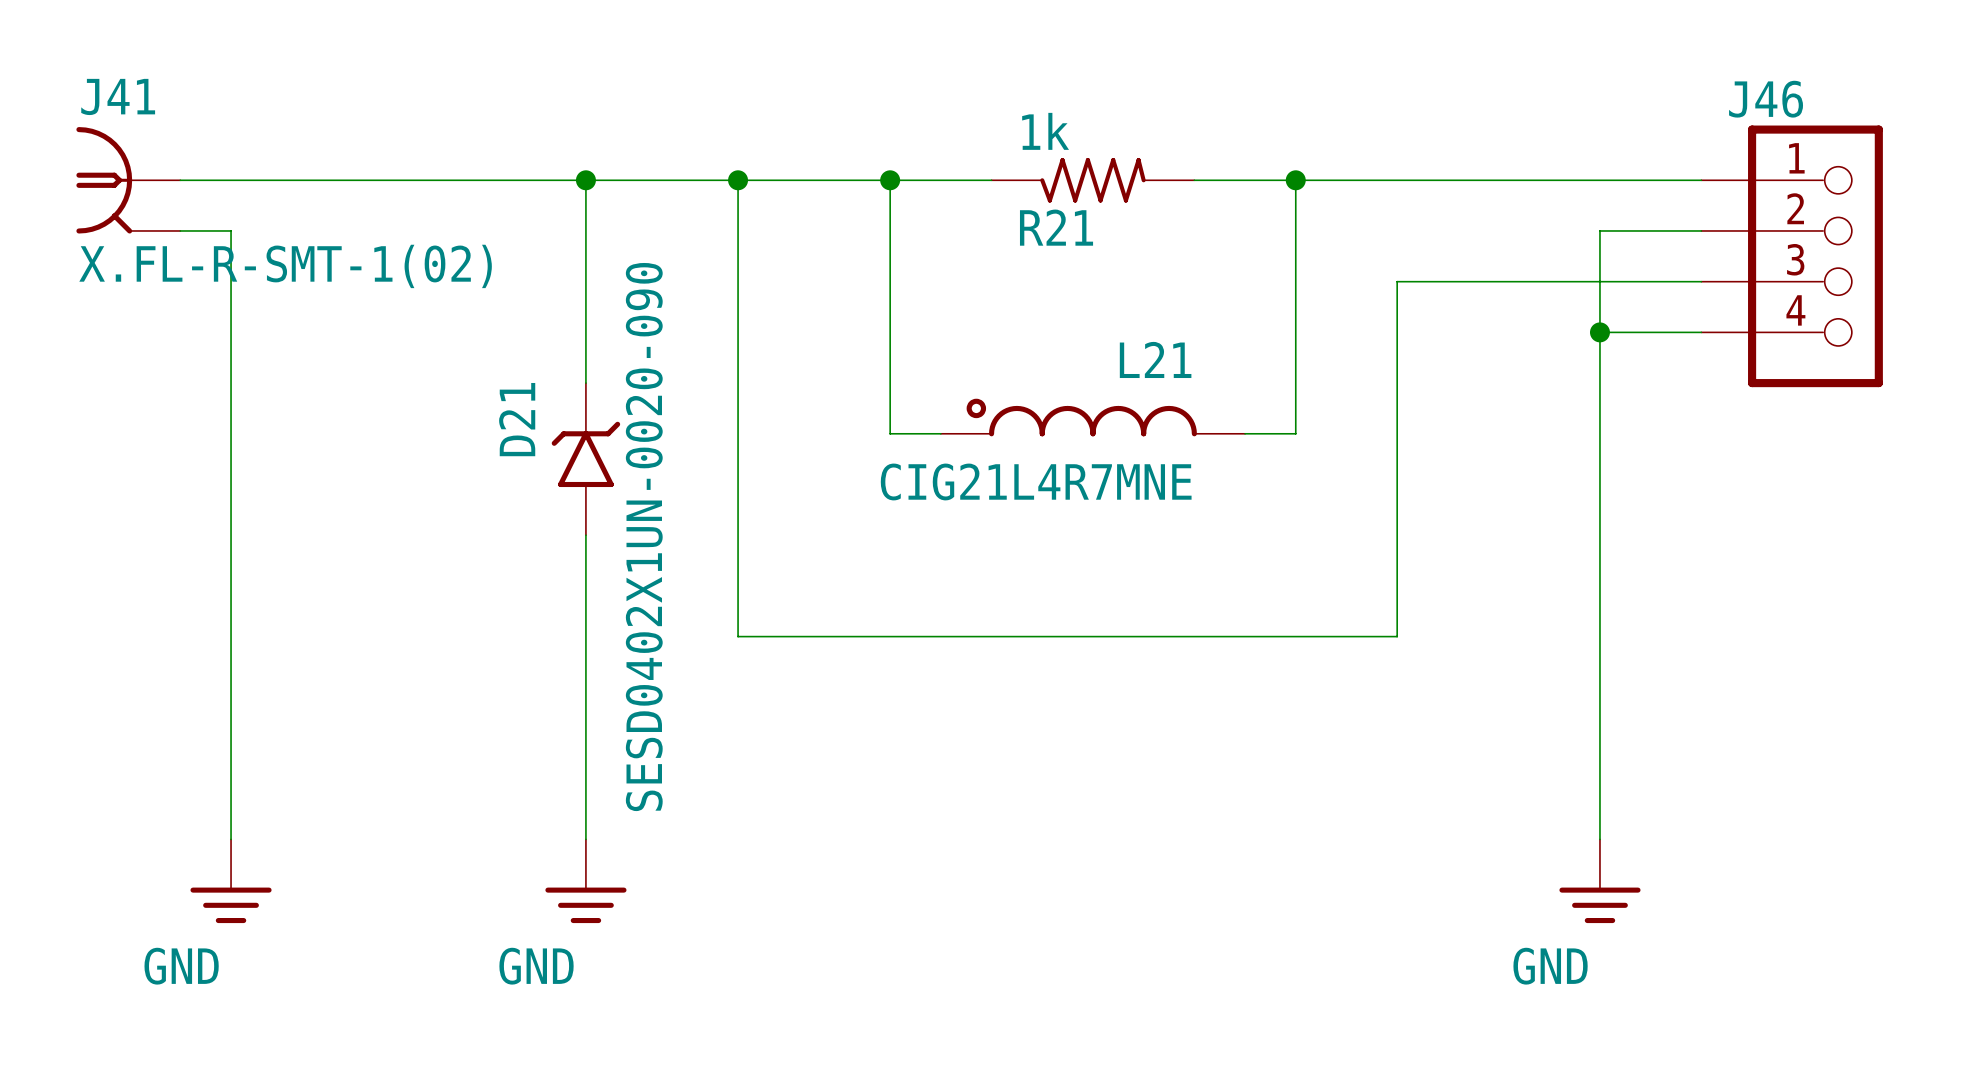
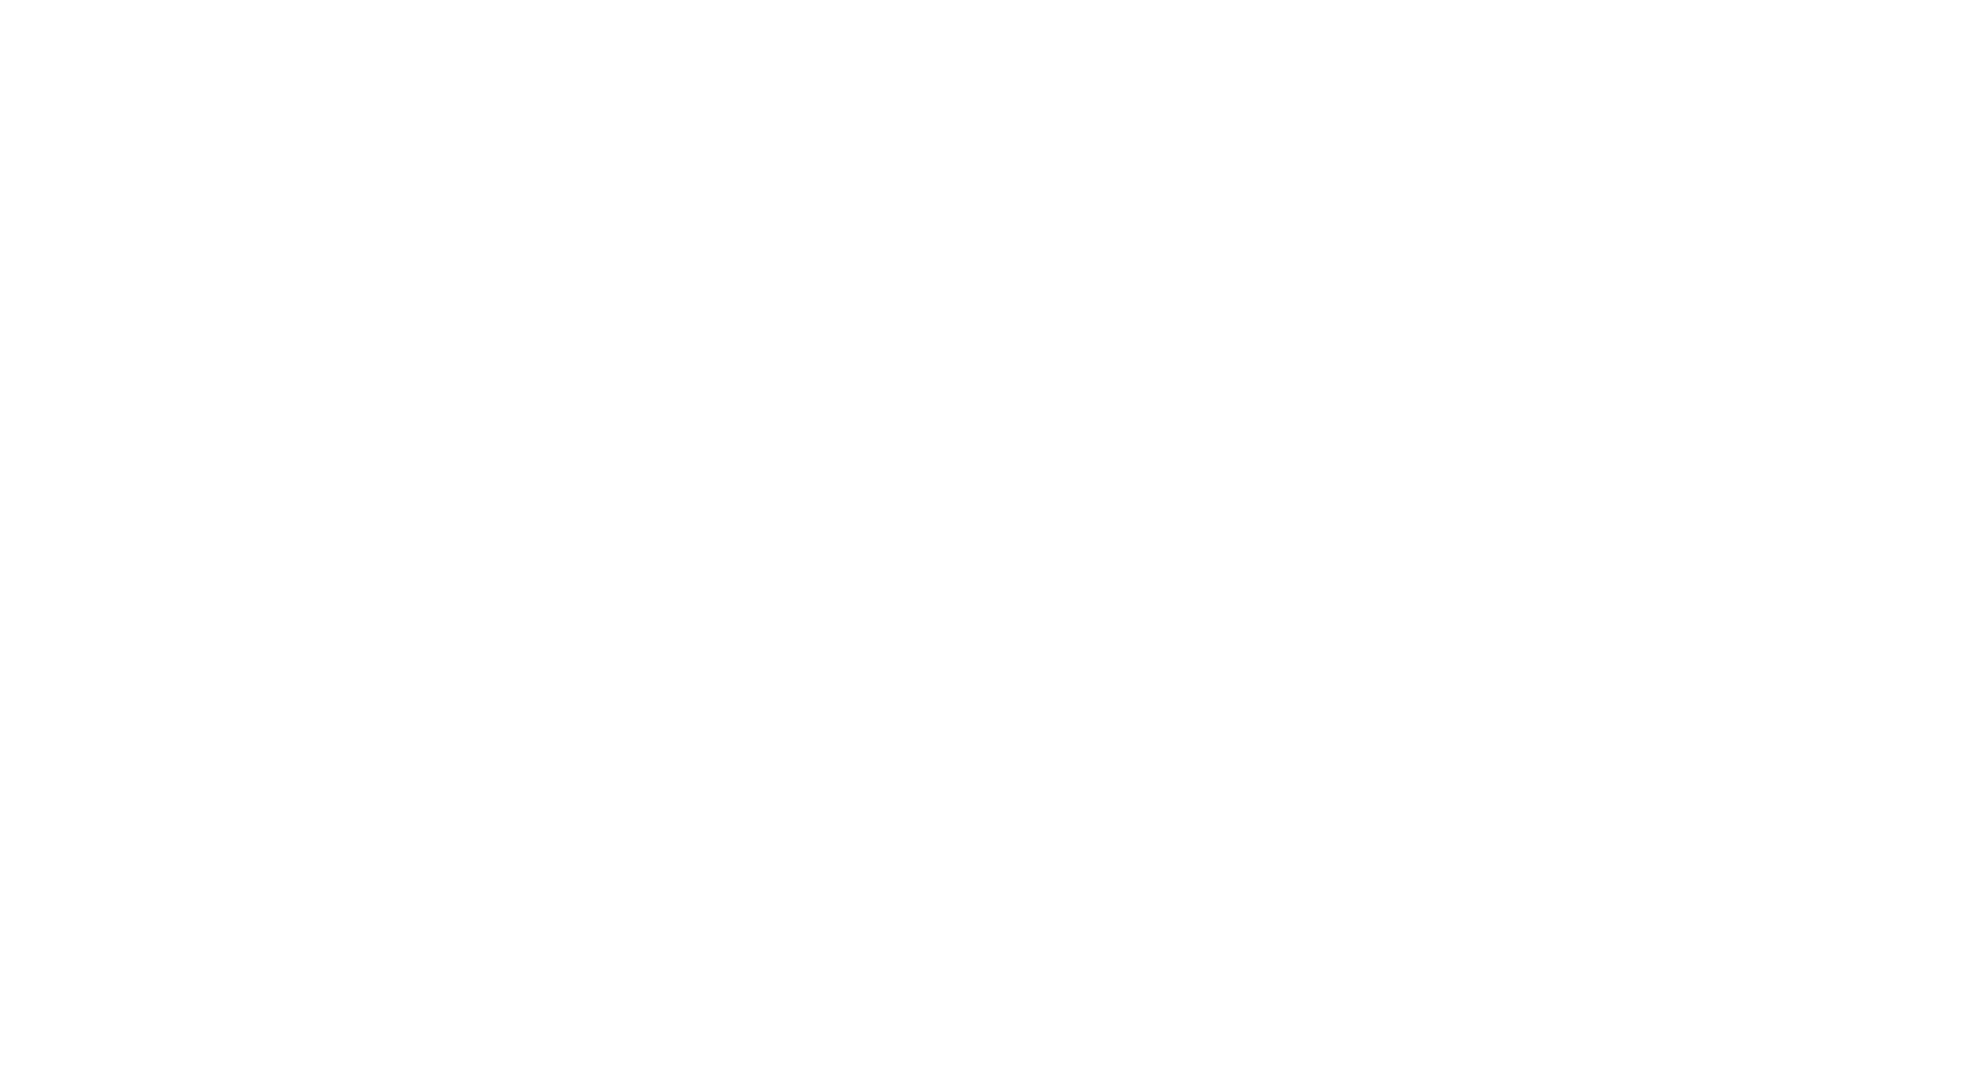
J41: X.FL-R-SMT-1(02) (128, 180) -> none
wire: (180, 180) (991, 180) -> none
wire: (585, 180) (585, 383) -> none
junction: (585, 180) -> none
wire: (738, 180) (738, 636) (1397, 636) (1397, 281) (1701, 281) -> none
junction: (738, 180) -> none
wire: (890, 180) (890, 433) (940, 433) -> none
junction: (890, 180) -> none
R21: 1k (1092, 180) -> none
wire: (1194, 180) (1701, 180) -> none
wire: (1295, 180) (1295, 433) (1245, 433) -> none
junction: (1295, 180) -> none
wire: (180, 230) (231, 230) (231, 839) -> none
wire: (1701, 230) (1599, 230) (1599, 839) -> none
J46: (1792, 256) -> none
wire: (1599, 332) (1701, 332) -> none
junction: (1599, 332) -> none
L21: CIG21L4R7MNE (1092, 417) -> none
D21: SESD0402X1UN-0020-090 (585, 459) -> none
wire: (585, 535) (585, 839) -> none
power symbol: GND (231, 881) -> none
power symbol: GND (585, 881) -> none
power symbol: GND (1599, 881) -> none

